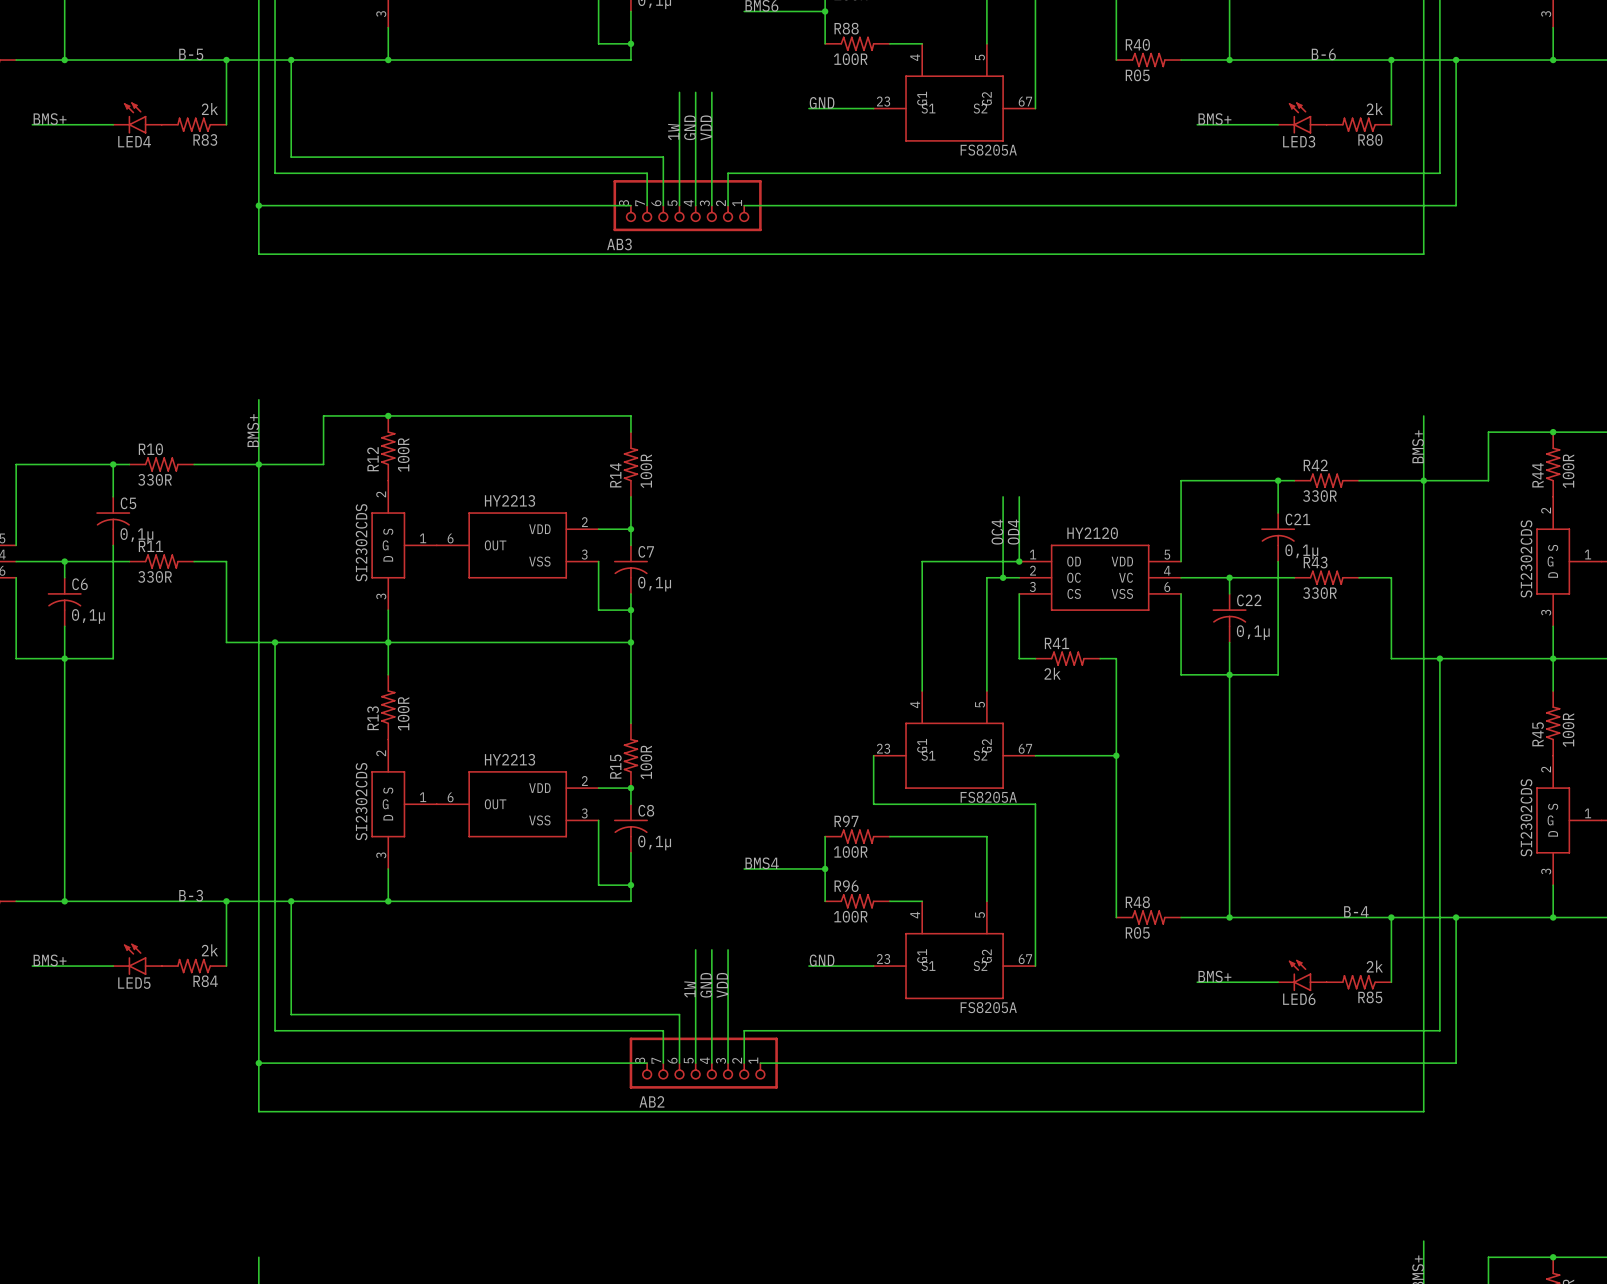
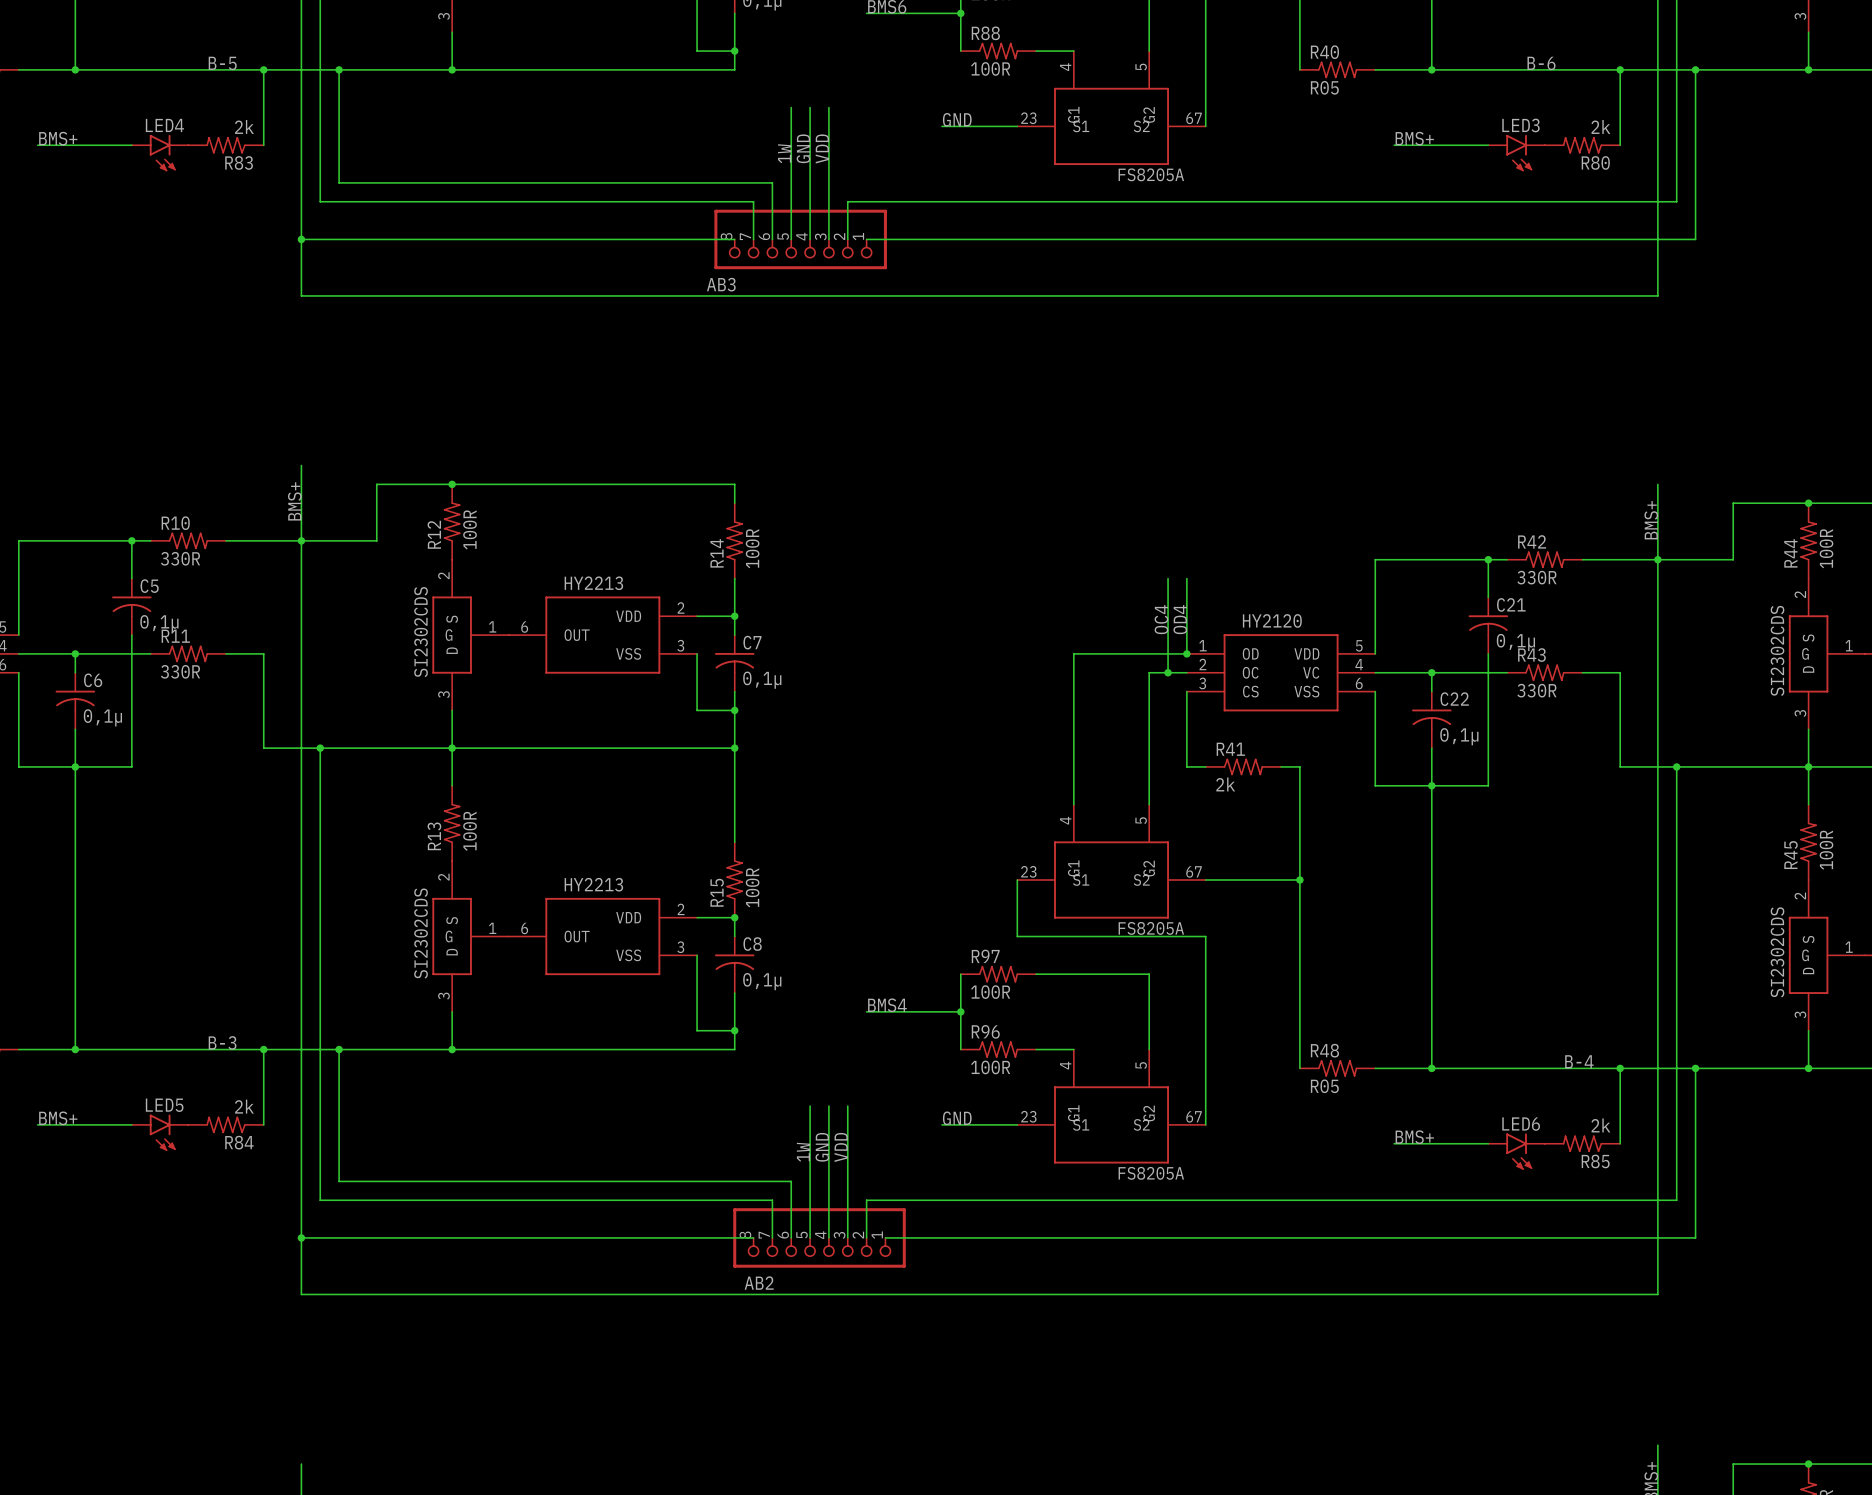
LED4 rotation: 0° (135, 118) -> 180° (162, 153)
LED3 rotation: 0° (1300, 118) -> 180° (1519, 153)
LED5 rotation: 0° (135, 959) -> 180° (162, 1132)
LED6 rotation: 0° (1300, 975) -> 180° (1519, 1151)

